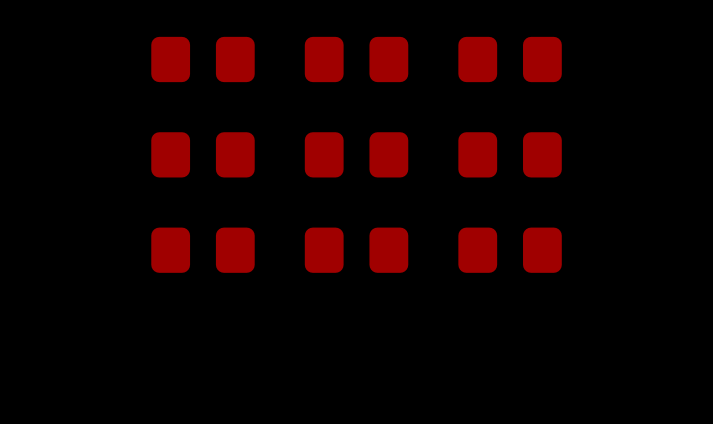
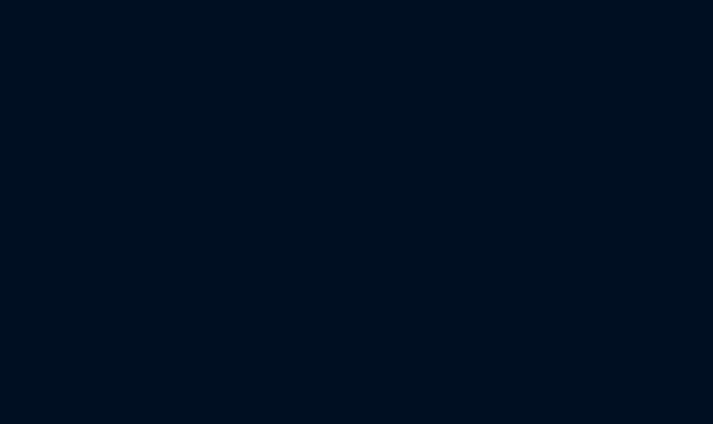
part: (202, 59) -> none
part: (356, 59) -> none
part: (510, 59) -> none
part: (202, 154) -> none
part: (356, 154) -> none
part: (510, 154) -> none
part: (202, 250) -> none
part: (356, 250) -> none
part: (510, 250) -> none

